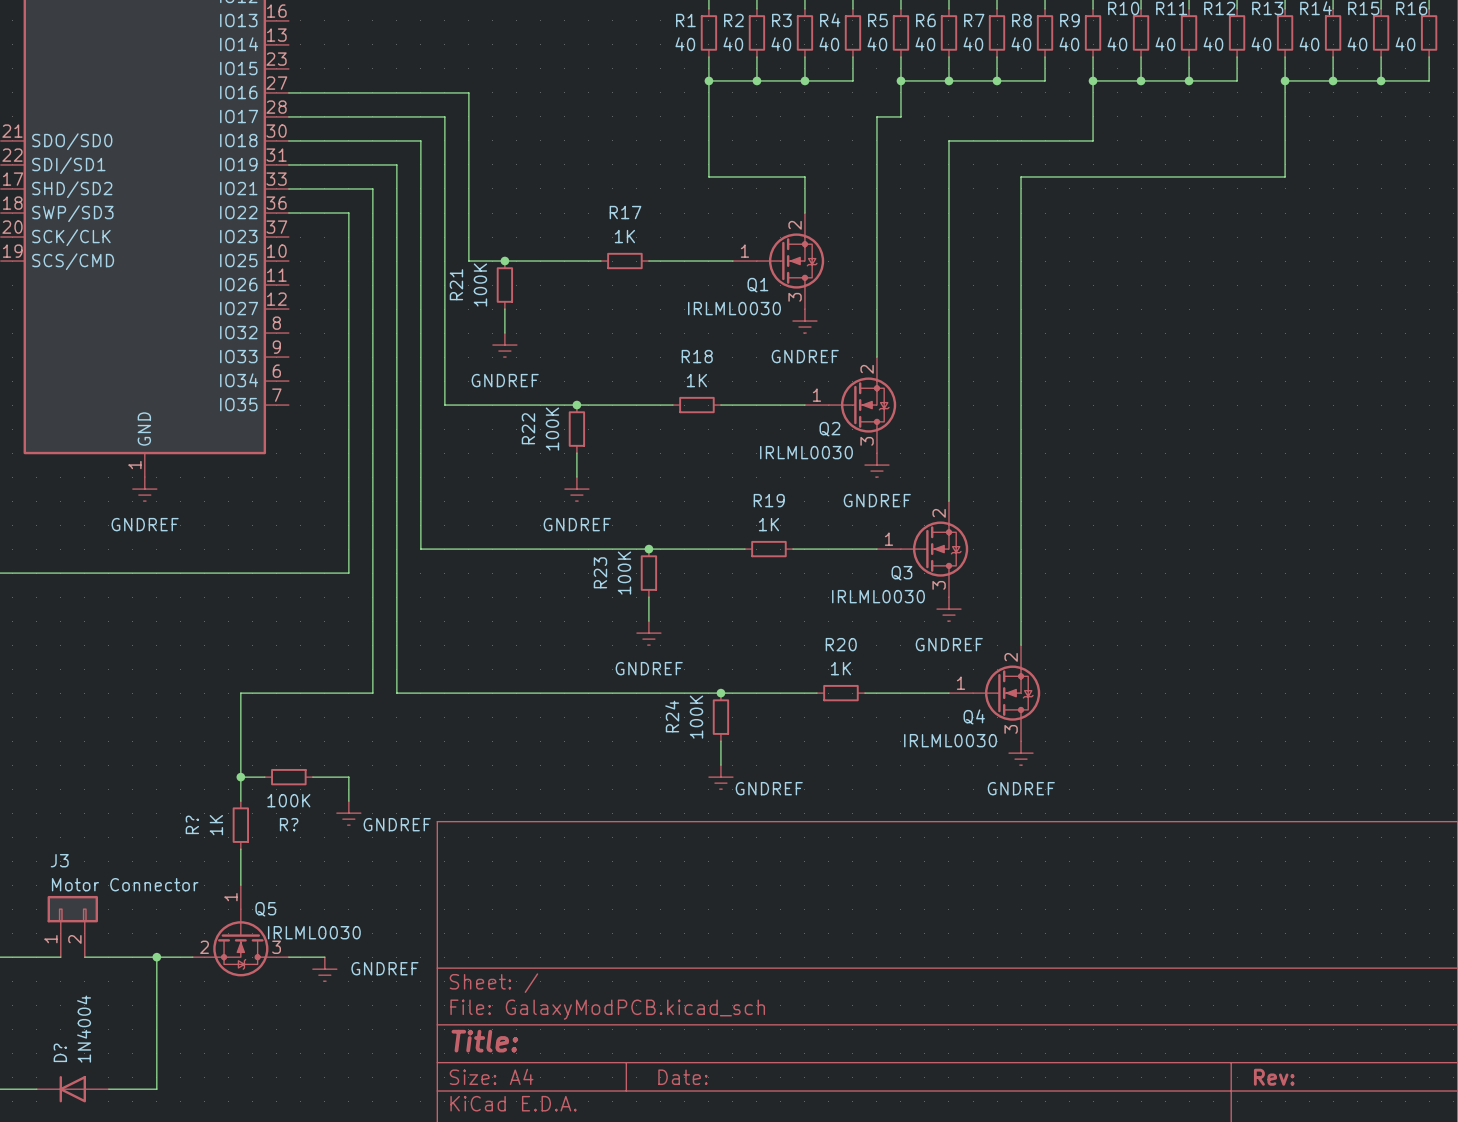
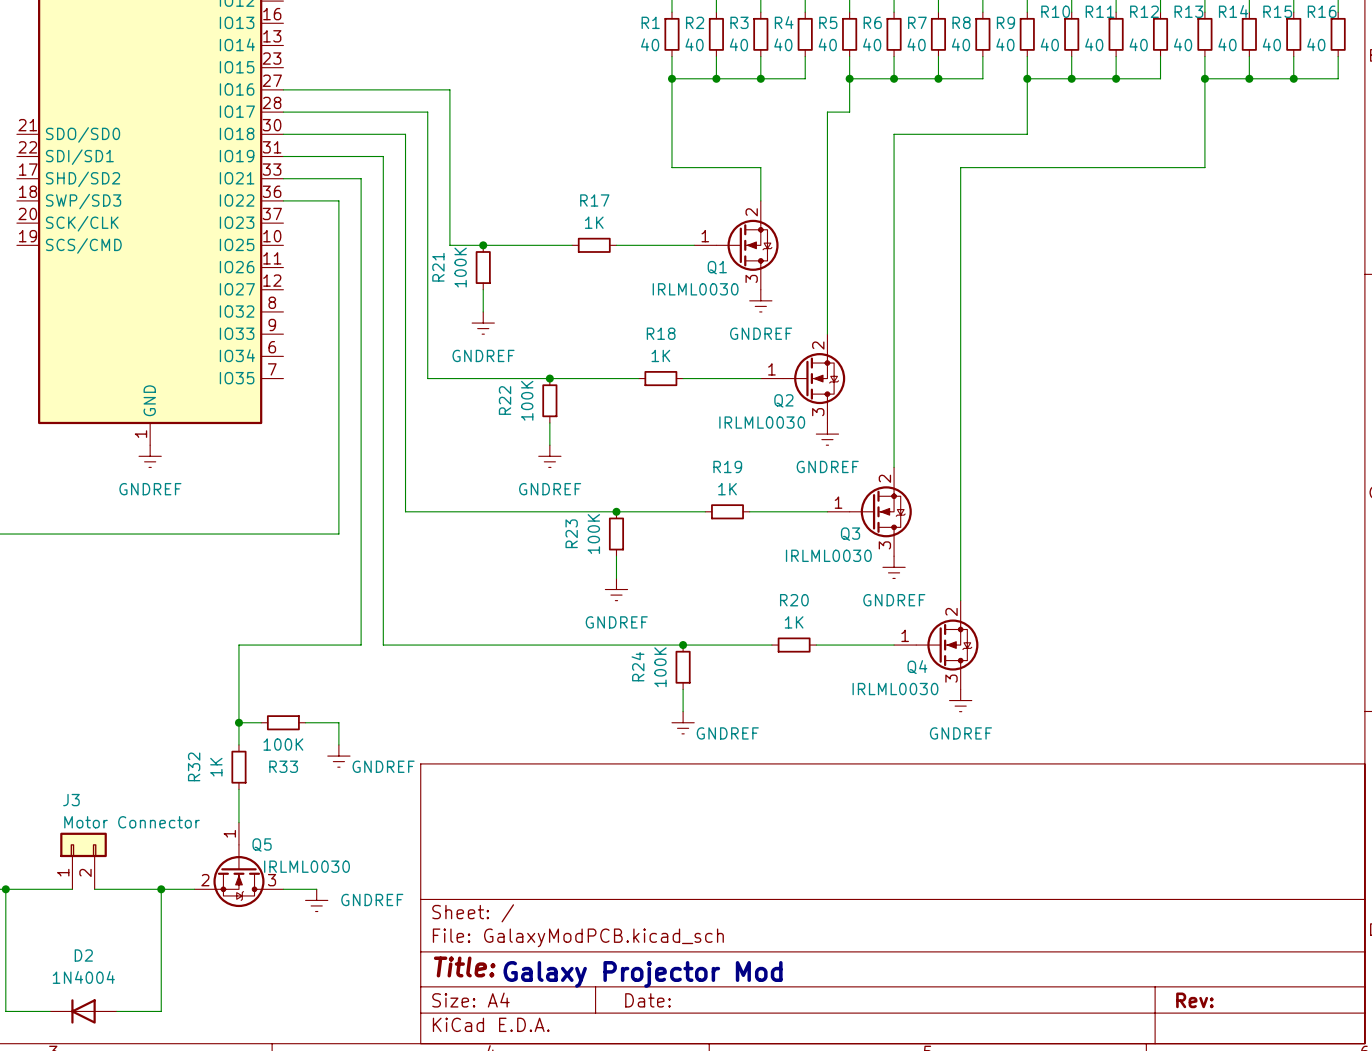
R? name: R? (192, 824) -> R32 (194, 766)
R? name: R? (289, 824) -> R33 (283, 766)
D? value rotation: 0° (84, 1029) -> 90° clockwise (83, 977)
text: none -> Galaxy Projector Mod (643, 974)
D? name: D? (60, 1052) -> D2 (83, 955)

